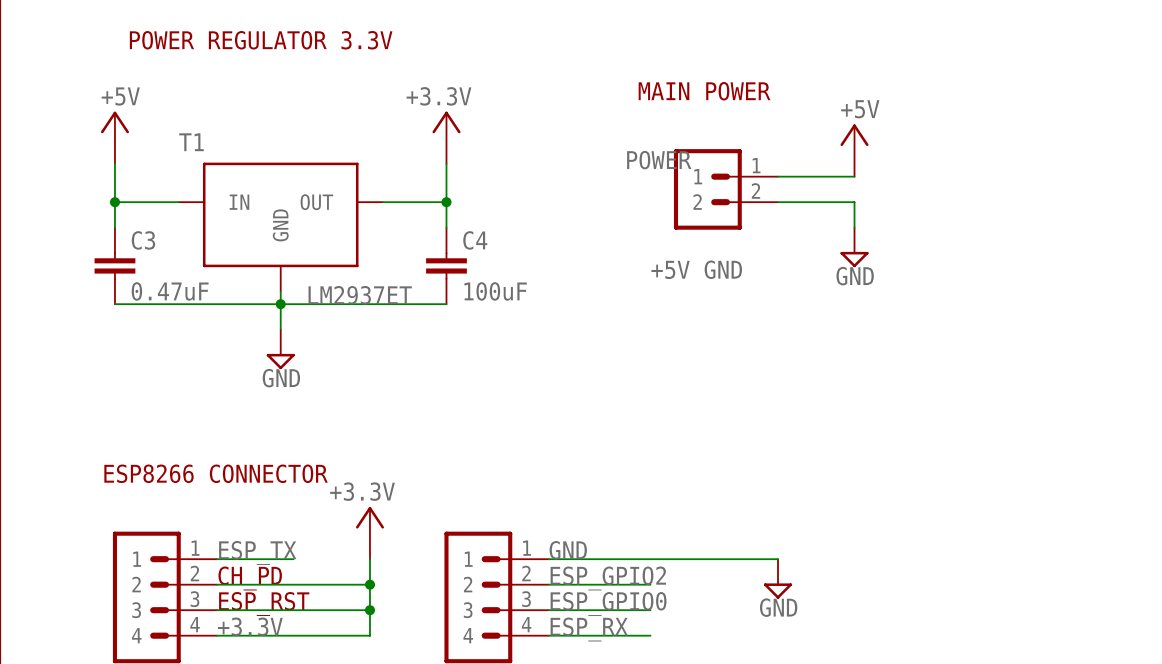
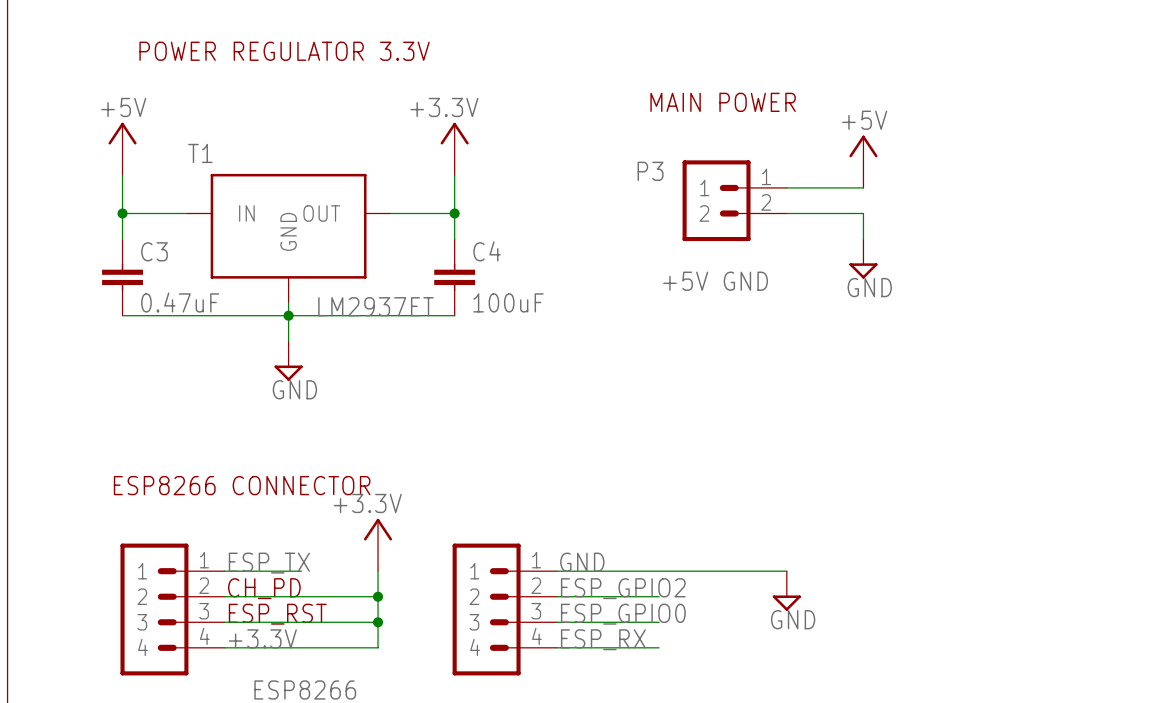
POWER name: POWER (659, 160) -> P3 (650, 171)

